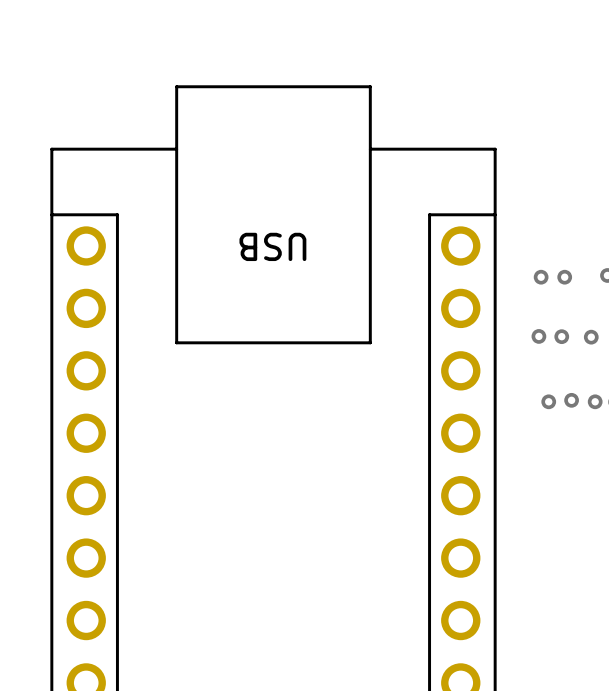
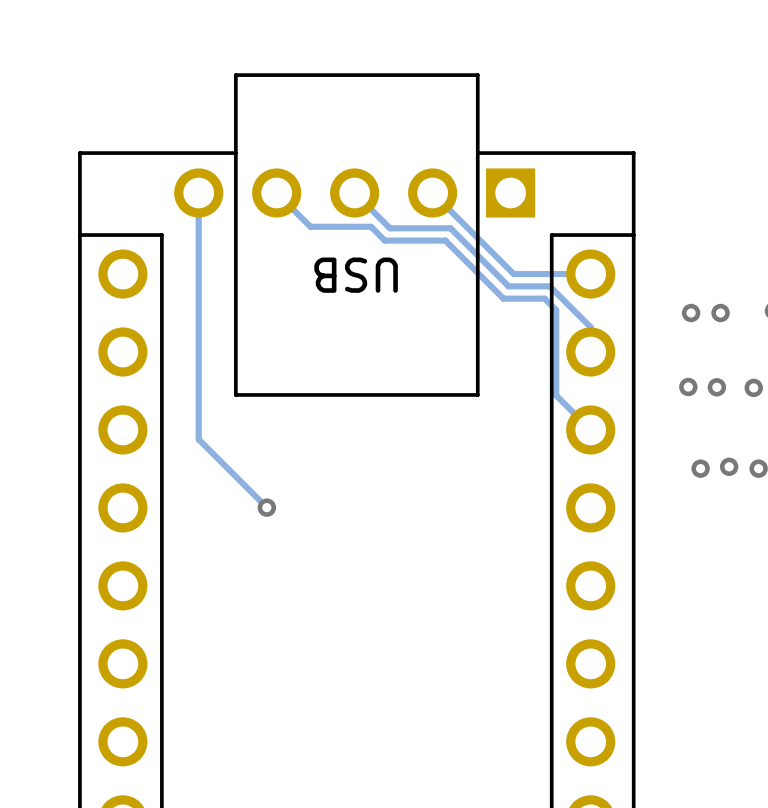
track: none -> (198, 192) (198, 439) (266, 507)
track: none -> (276, 192) (310, 226) (371, 226) (384, 240) (445, 240) (503, 298) (544, 298) (556, 310) (556, 395) (590, 429)
track: none -> (354, 192) (389, 228) (450, 228) (508, 286) (549, 286) (590, 327) (590, 351)
part: none -> (354, 192)
track: none -> (432, 192) (513, 274) (590, 274)
via: none -> (266, 507)

